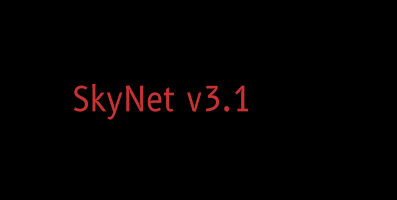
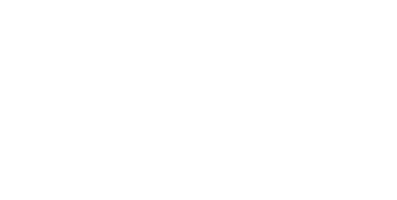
text: SkyNet v3.1 (160, 101) -> none

